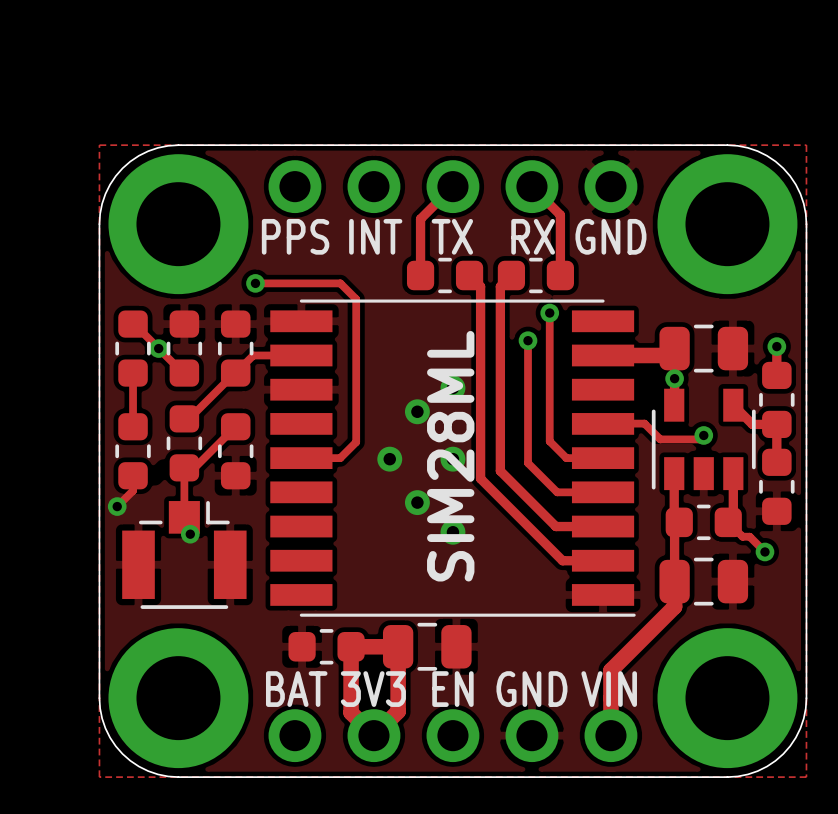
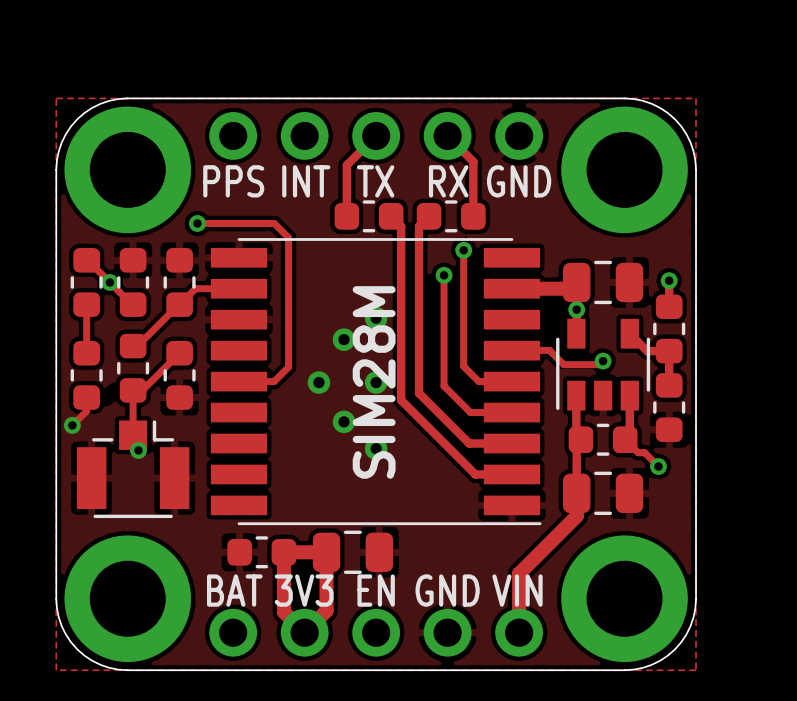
SIM28ML name: SIM28ML (450, 456) -> SIM28M (374, 382)

